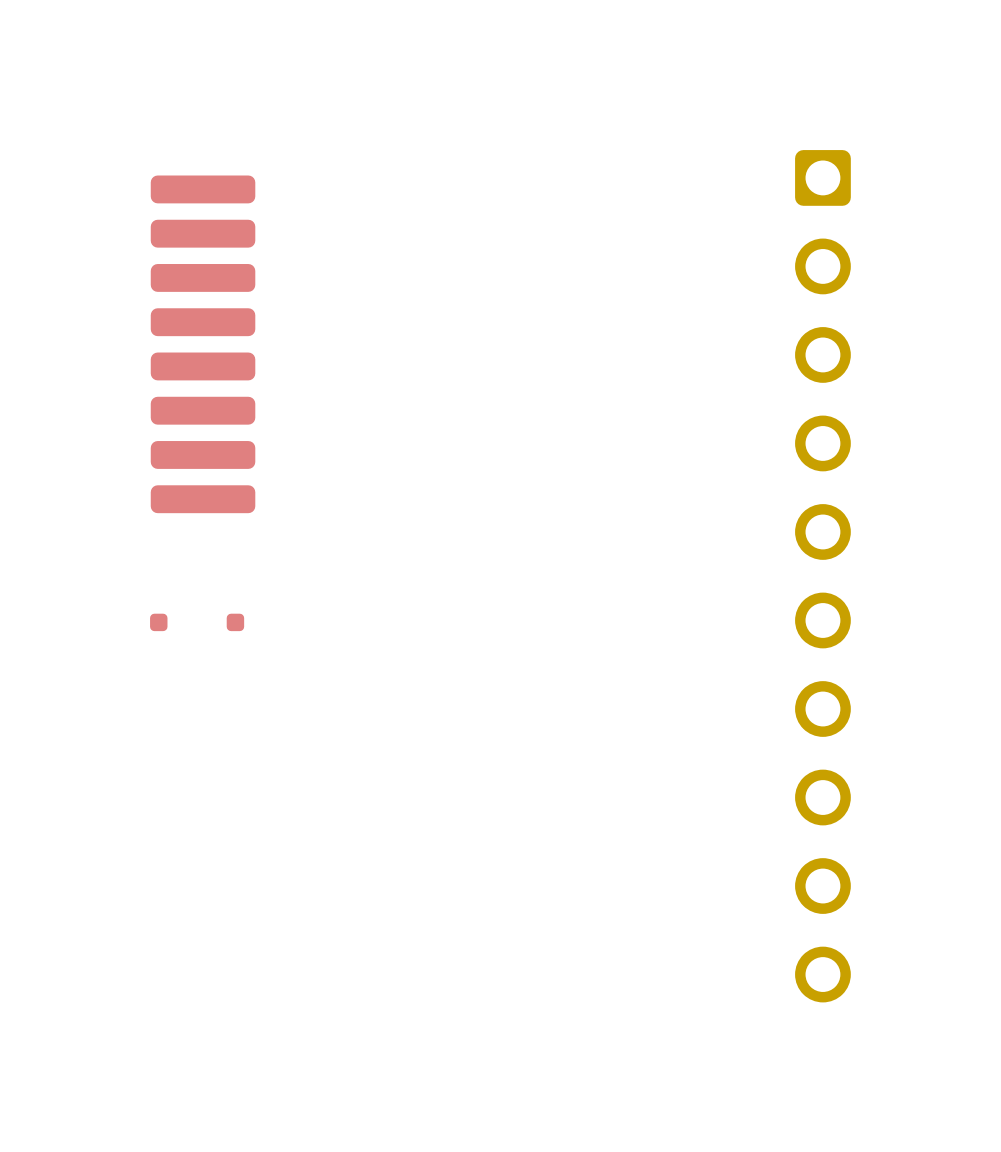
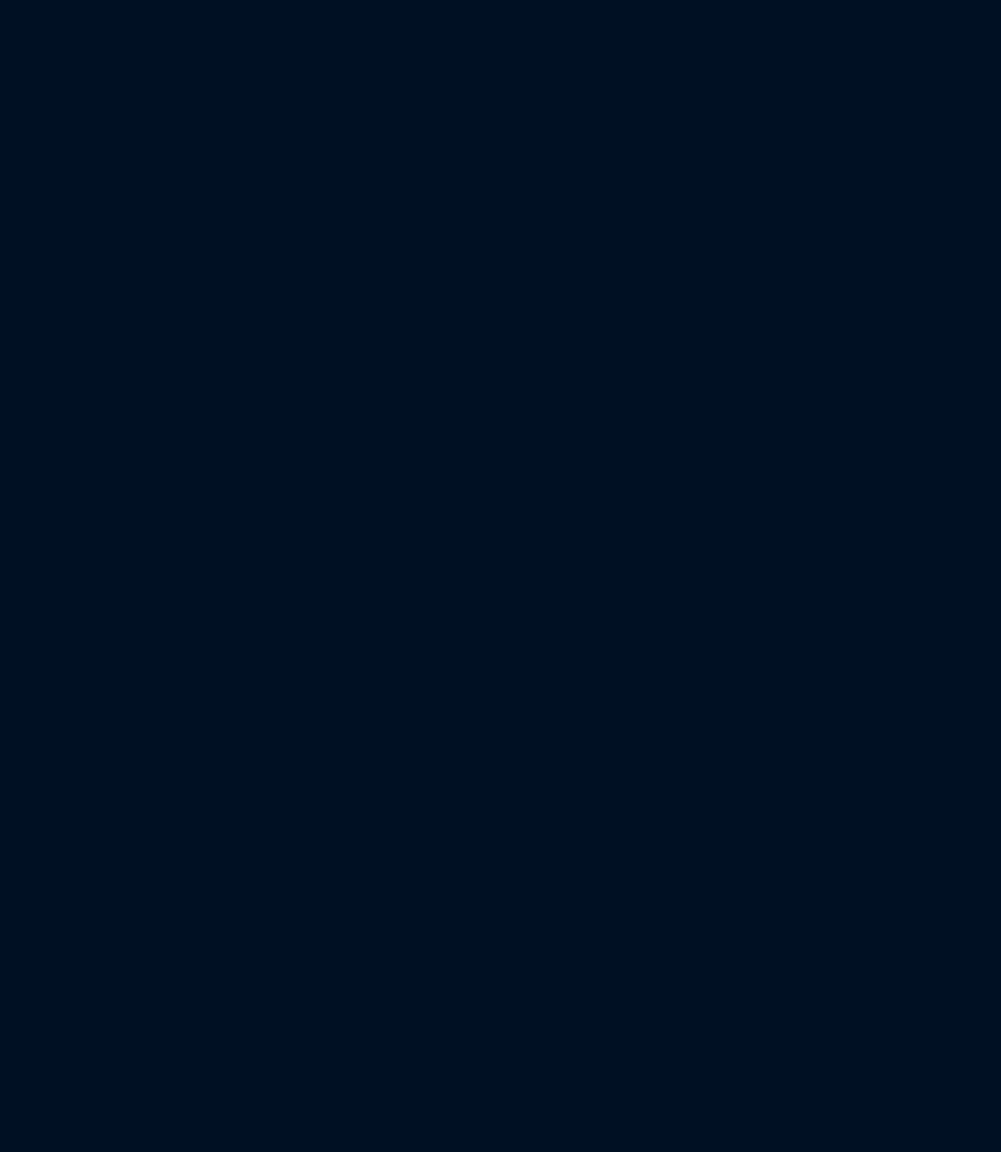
part: (203, 344) -> none
part: (822, 576) -> none
part: (197, 622) -> none

